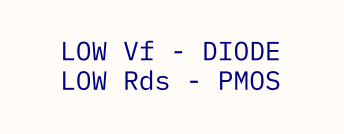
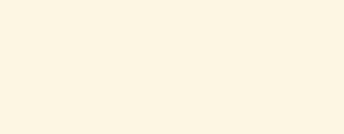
text: LOW Vf - DIODE (170, 50) -> none
text: LOW Rds - PMOS (171, 80) -> none

